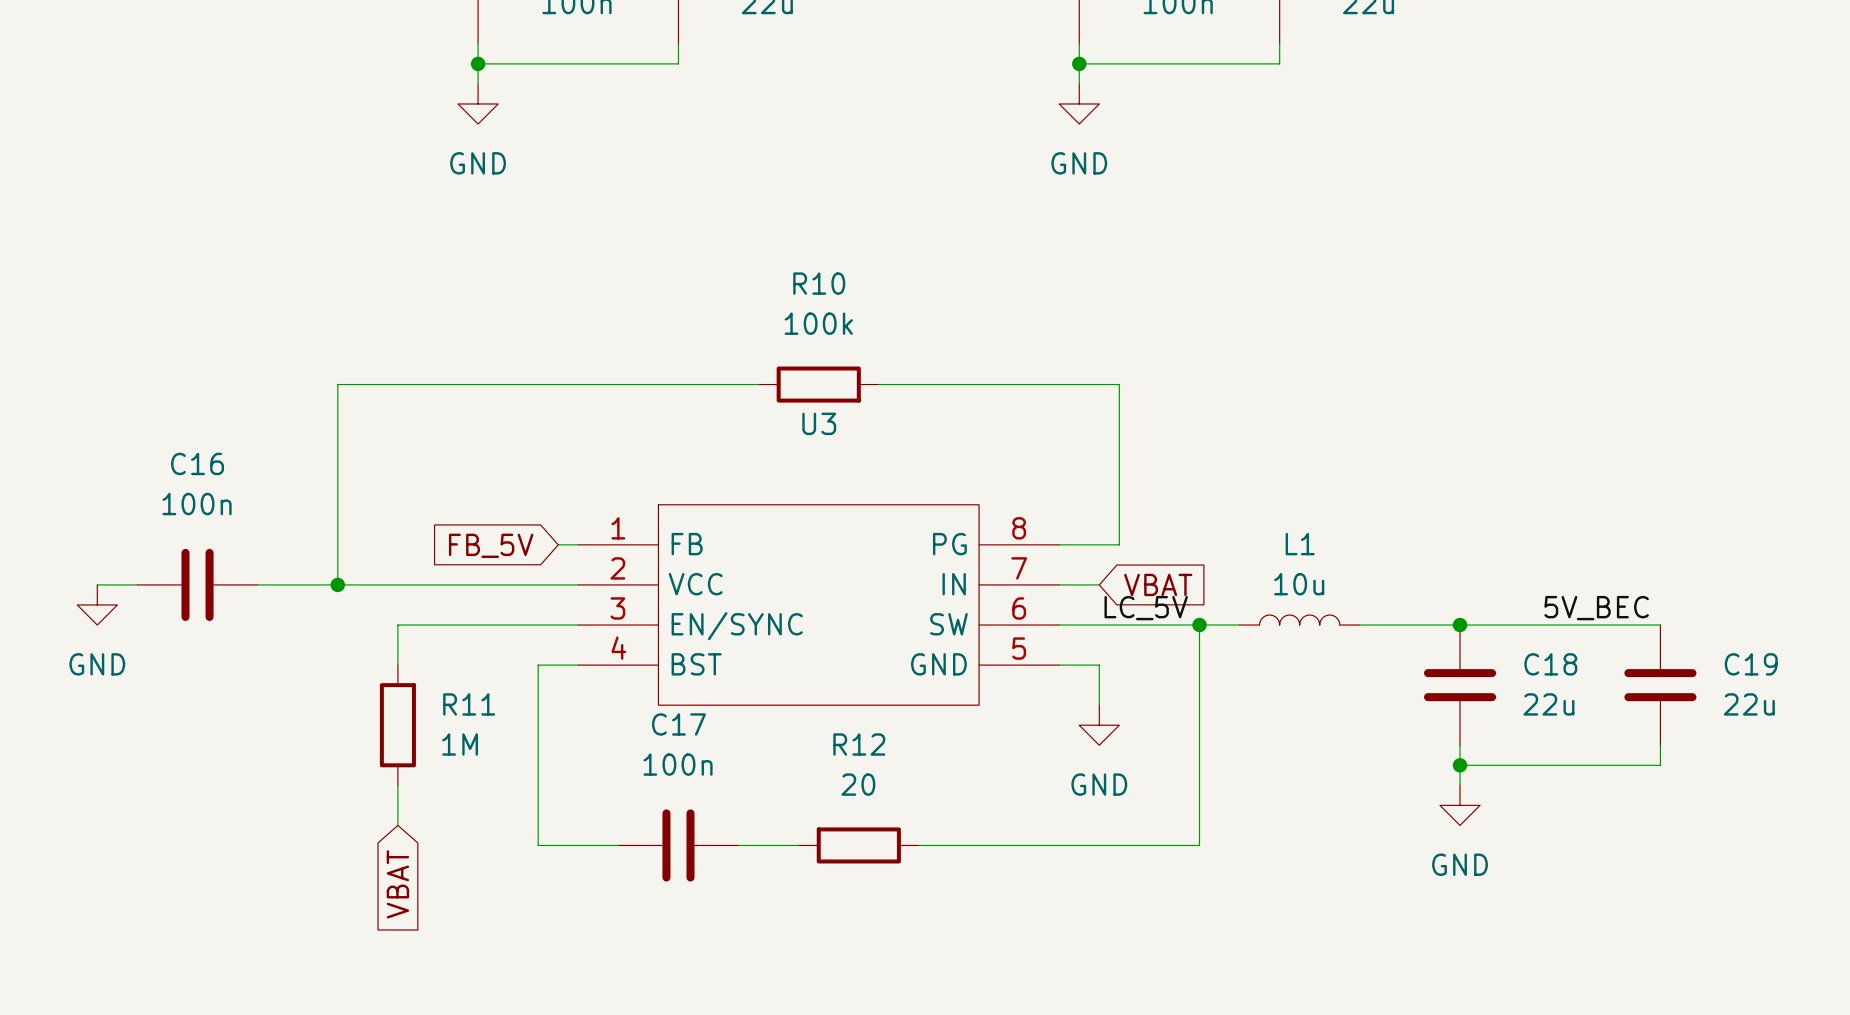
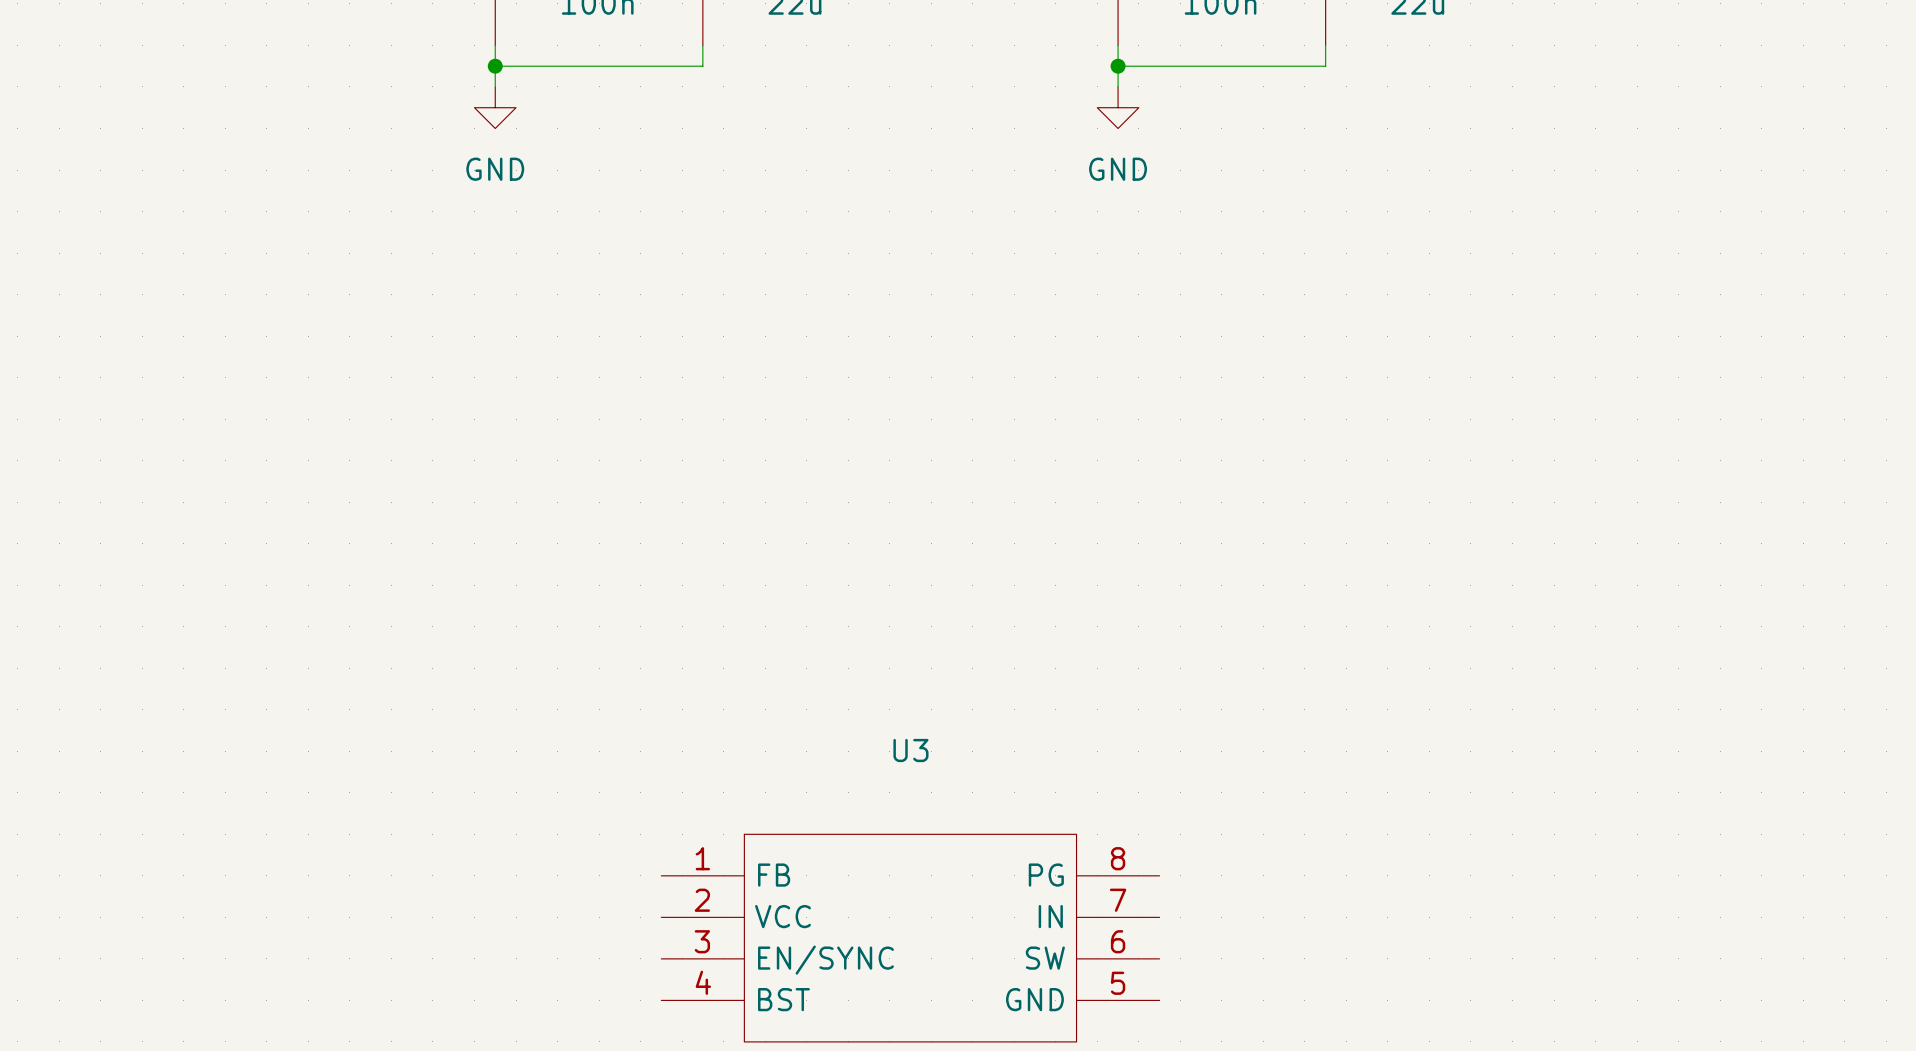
wire: (758, 384) (337, 384) (337, 584) -> none
R10: 100k (818, 384) -> none
wire: (878, 384) (1119, 384) (1119, 544) (1059, 544) -> none
wire: (558, 544) (578, 544) -> none
global label: FB_5V (491, 545) -> none
wire: (97, 584) (137, 584) -> none
C16: 100n (197, 584) -> none
wire: (257, 584) (578, 584) -> none
junction: (337, 584) -> none
wire: (1059, 584) (1099, 584) -> none
global label: VBAT (1158, 584) -> none
power symbol: GND (97, 604) -> none
U3 position: (818, 604) -> (910, 938)
label: LC_5V (1146, 608) -> none
label: 5V_BEC (1596, 608) -> none
L1: 10u (1299, 620) -> none
wire: (578, 625) (397, 625) (397, 665) -> none
wire: (1059, 625) (1239, 625) -> none
wire: (1199, 625) (1199, 845) (918, 845) -> none
junction: (1199, 625) -> none
wire: (1359, 625) (1660, 625) -> none
junction: (1460, 625) -> none
wire: (578, 665) (538, 665) (538, 845) (618, 845) -> none
wire: (1059, 665) (1099, 665) (1099, 705) -> none
C18: 22u (1460, 685) -> none
C19: 22u (1660, 685) -> none
R11: 1M (397, 725) -> none
power symbol: GND (1099, 725) -> none
wire: (1460, 745) (1460, 785) -> none
wire: (1660, 745) (1660, 765) (1460, 765) -> none
junction: (1460, 765) -> none
wire: (397, 785) (397, 825) -> none
power symbol: GND (1460, 805) -> none
C17: 100n (678, 845) -> none
wire: (738, 845) (798, 845) -> none
R12: 20 (858, 845) -> none
global label: VBAT (397, 884) -> none

